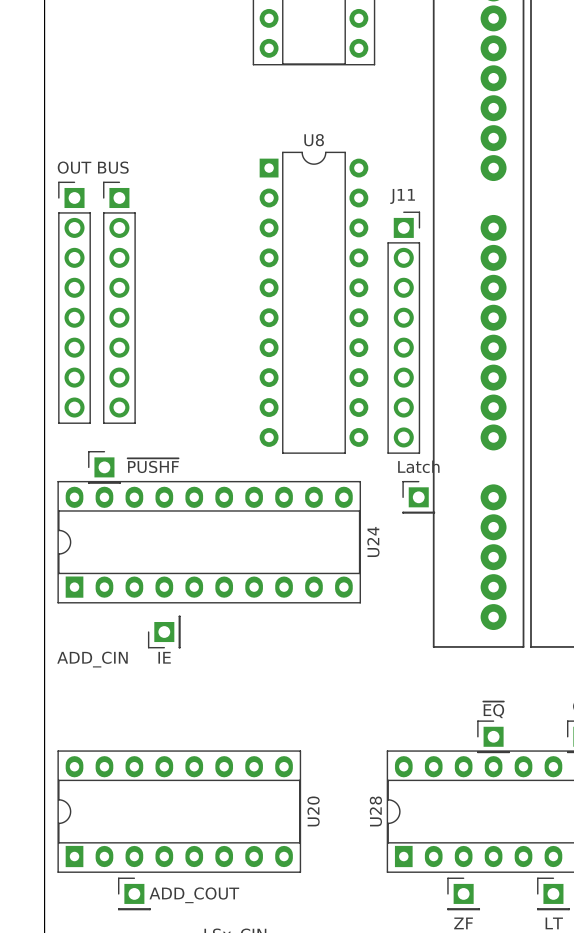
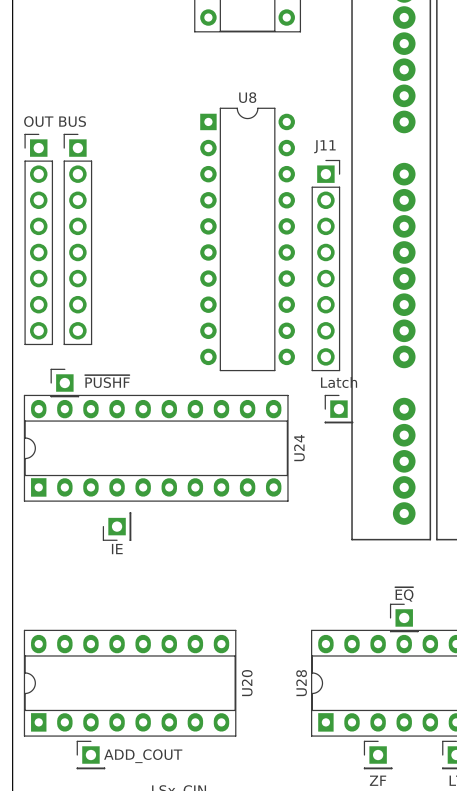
text: ADD_CIN (92, 659) -> none

